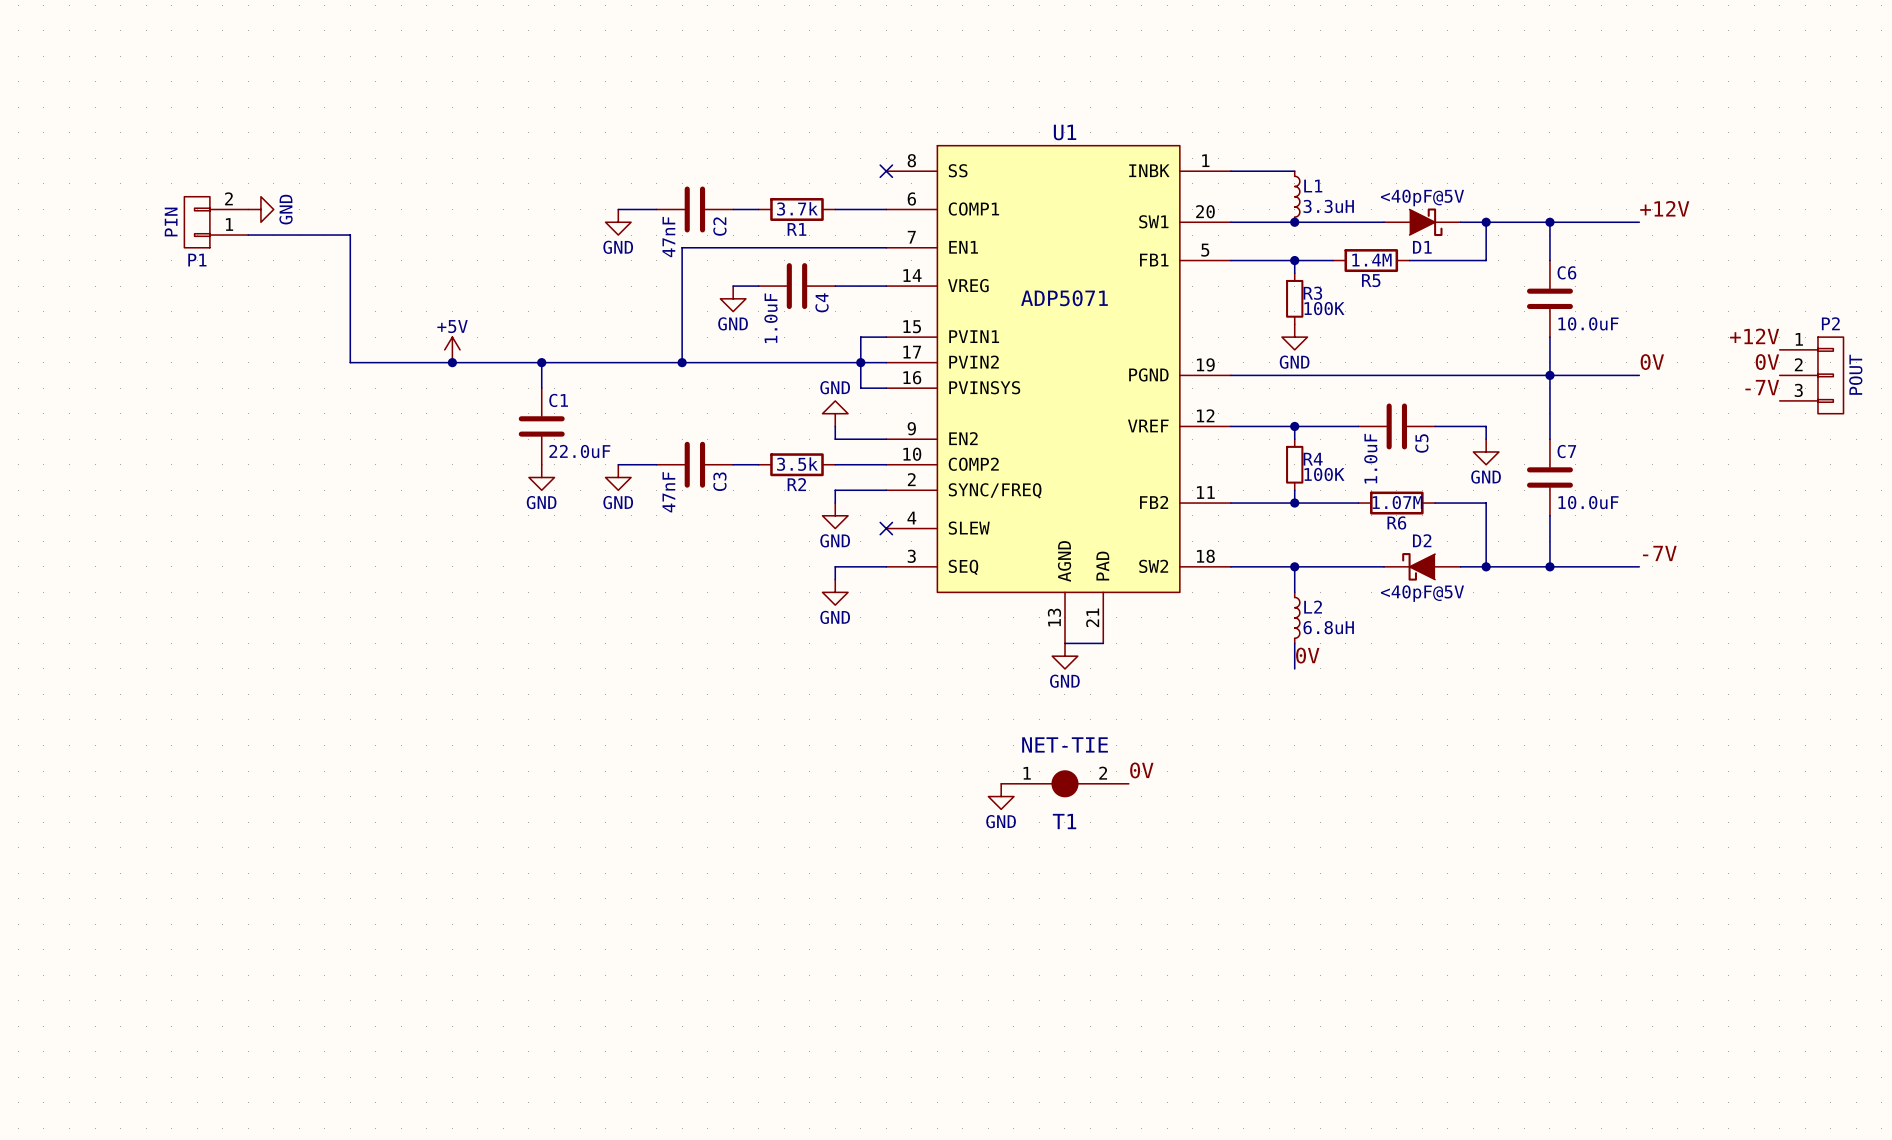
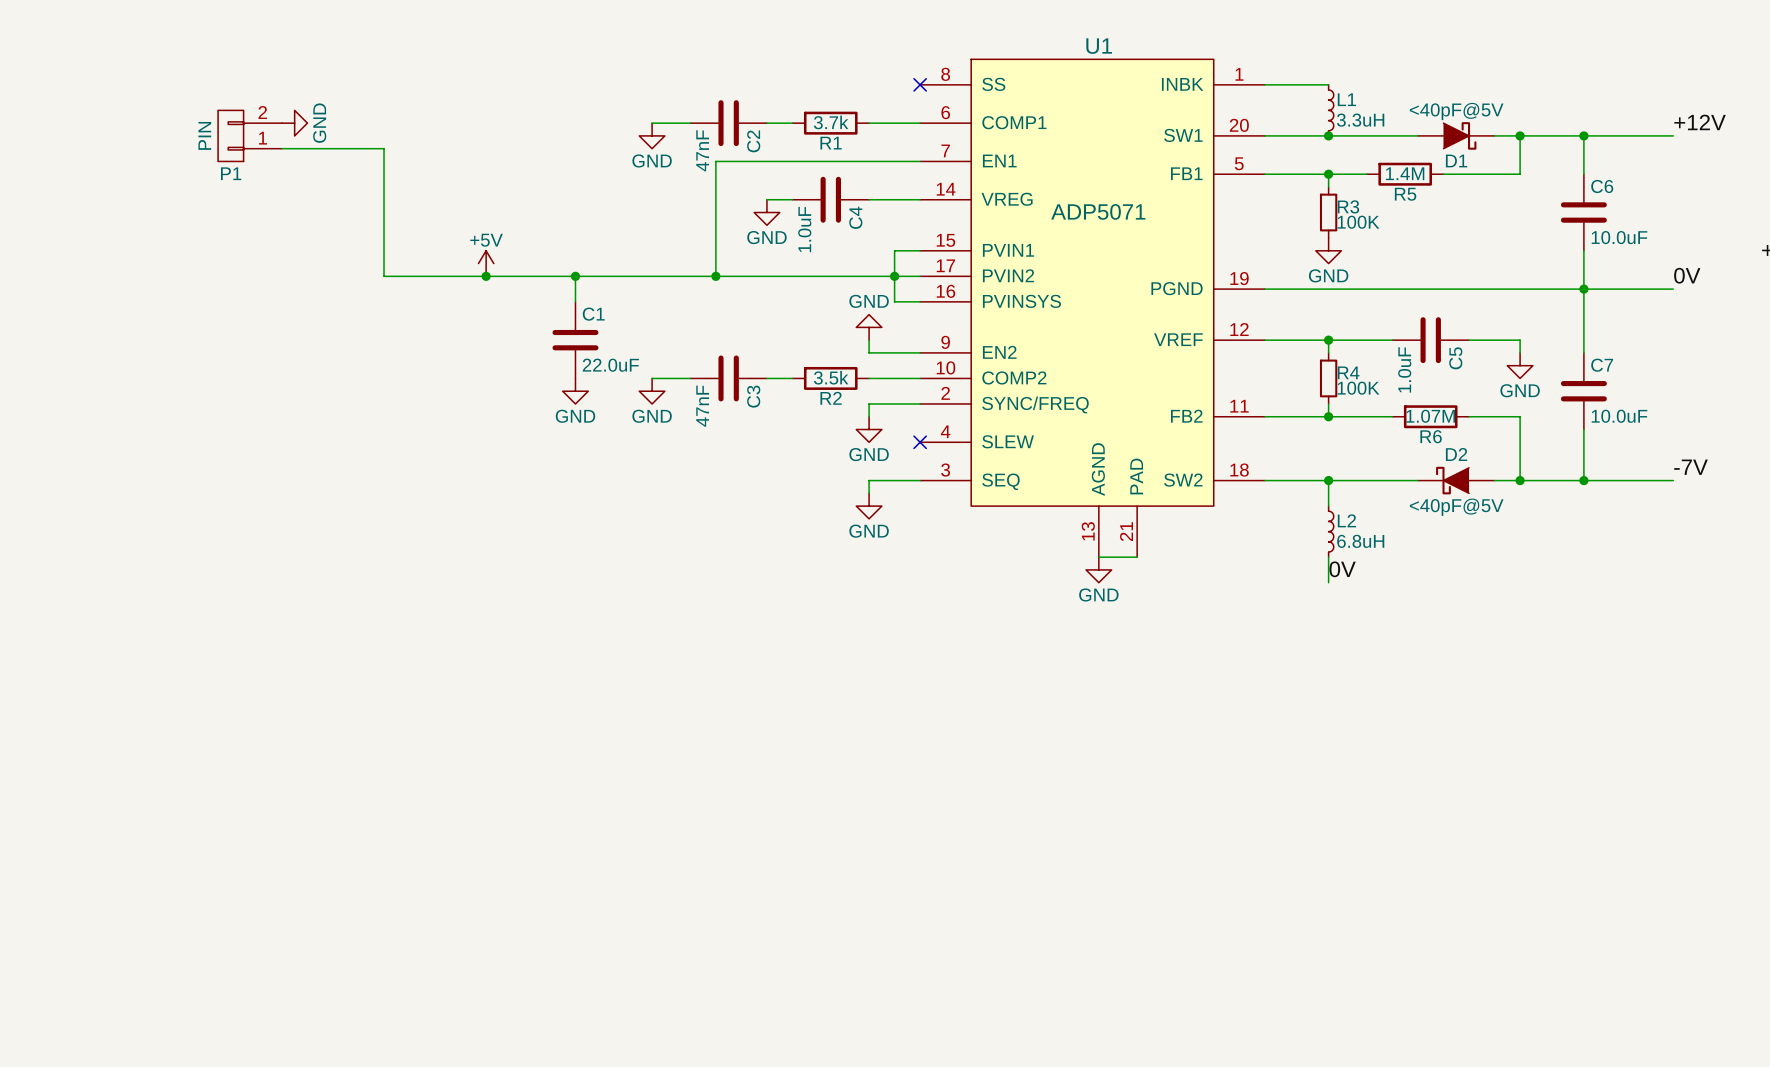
label: 0V (1141, 770) -> none
T1: NET-TIE (1064, 783) -> none
power symbol: GND (1001, 796) -> none

